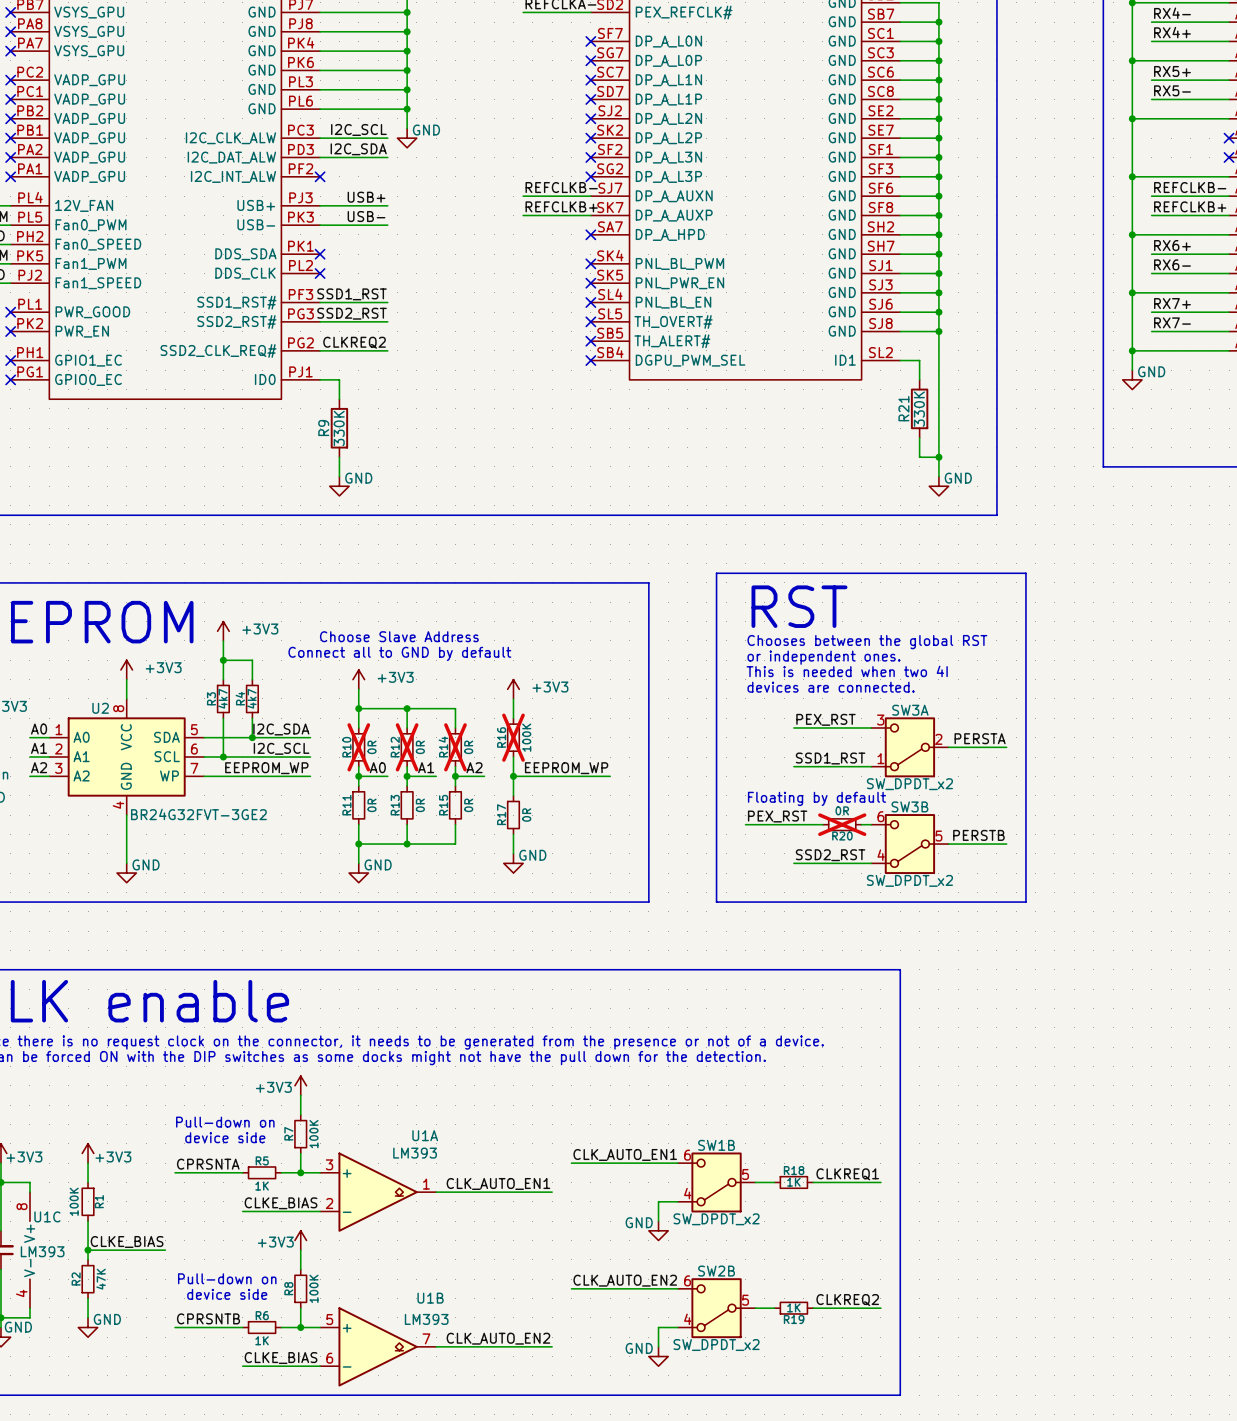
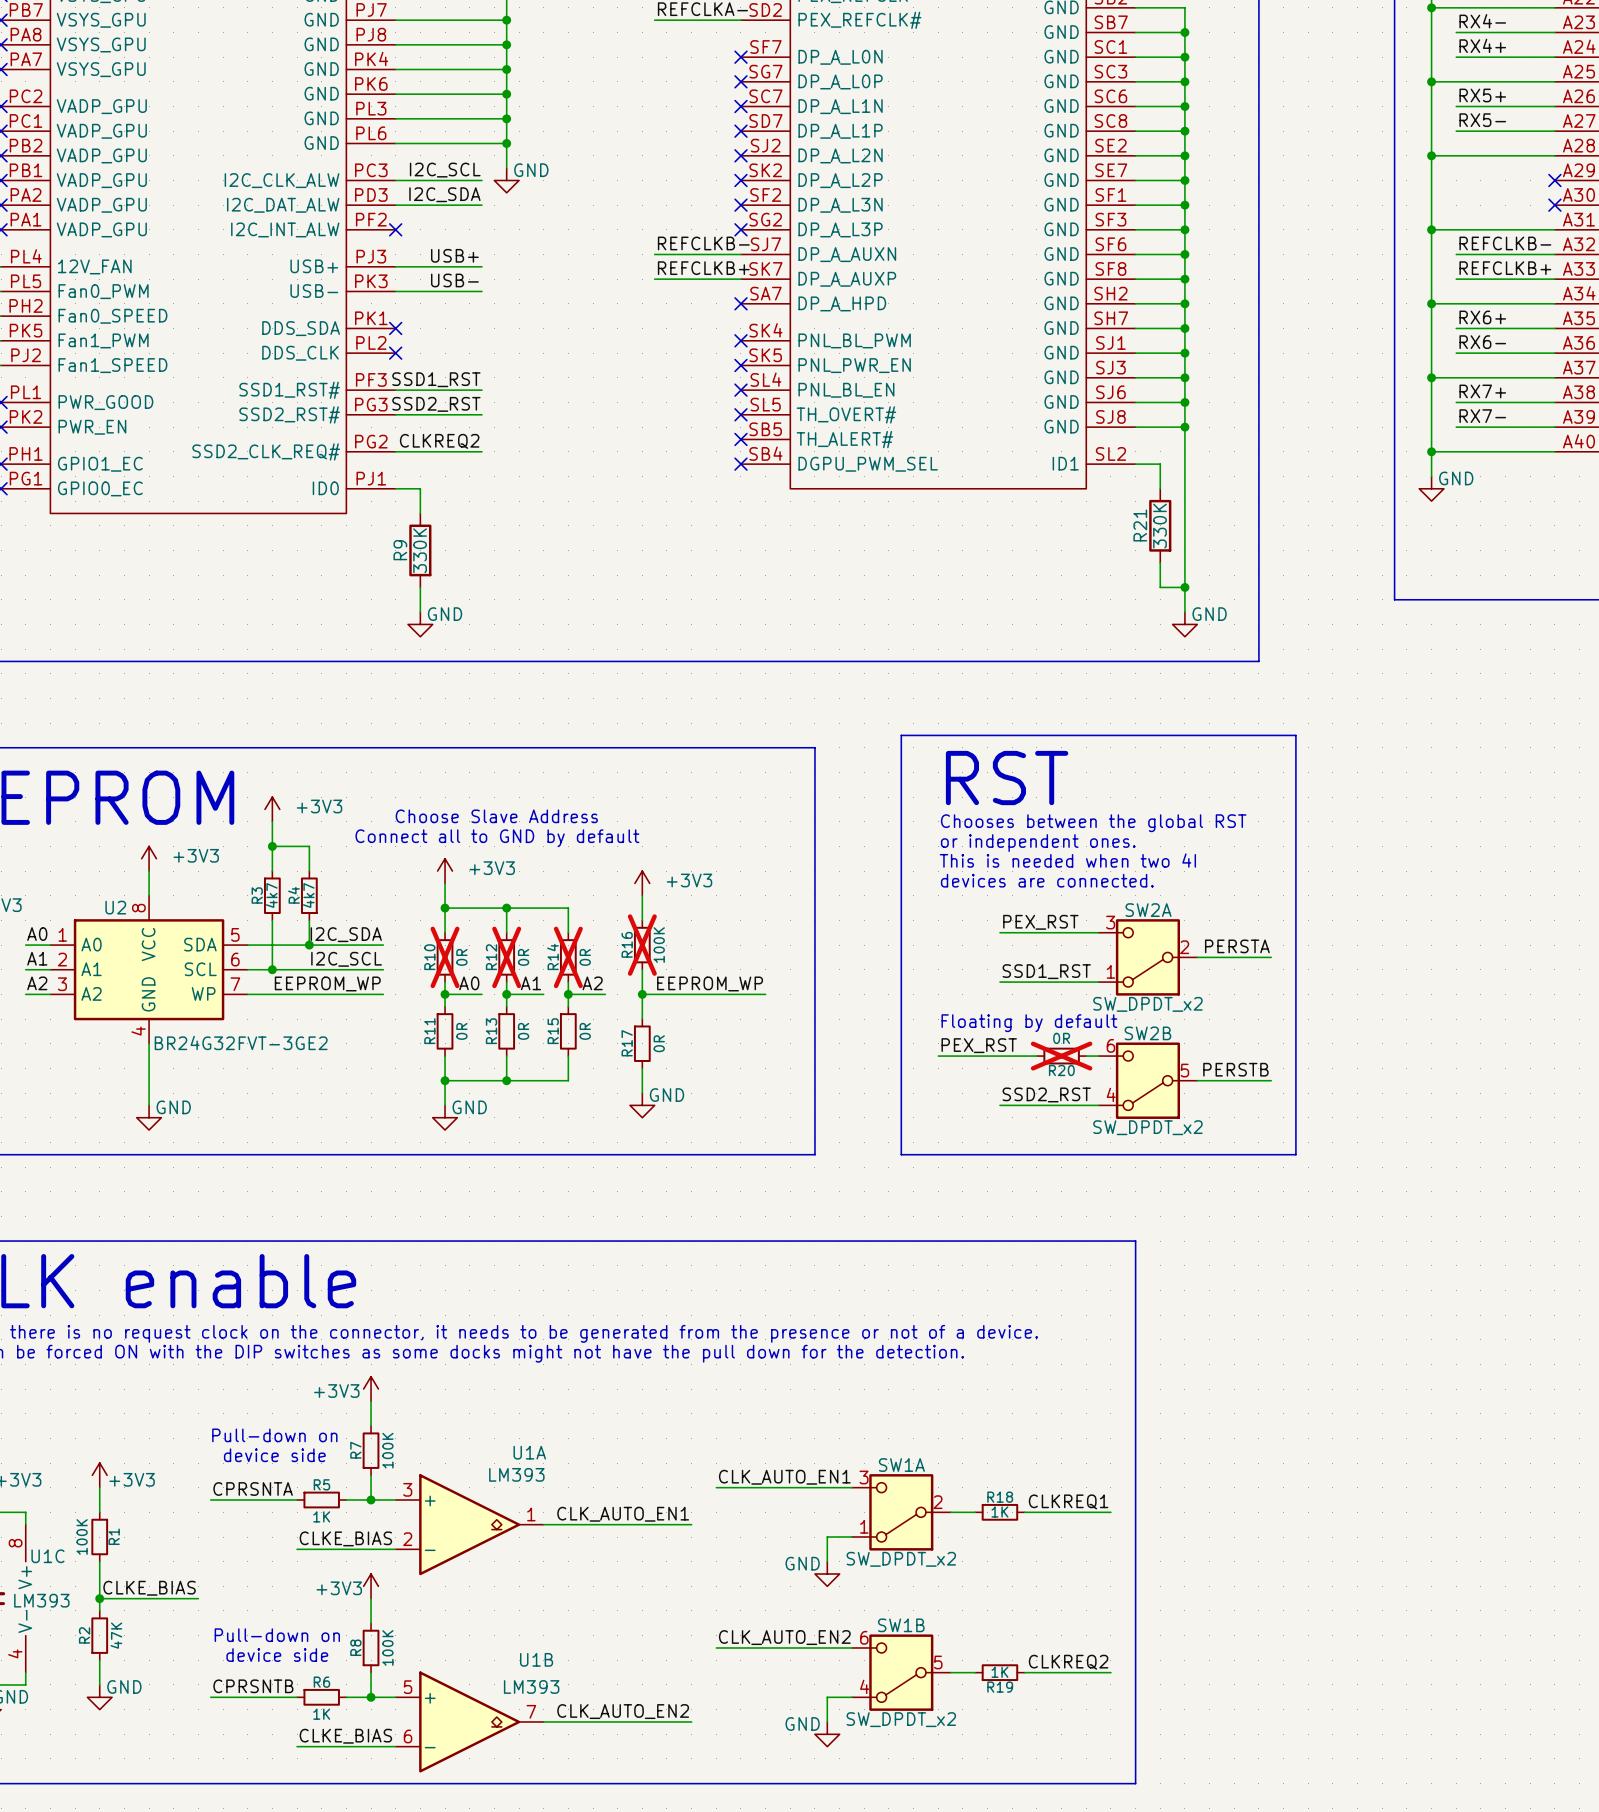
SW3A name: SW3A (910, 710) -> SW2A (1148, 910)
SW3B name: SW3B (909, 806) -> SW2B (1147, 1033)
SW1B name: SW1B (716, 1145) -> SW1A (901, 1465)
SW1B pin number: 6 (687, 1155) -> 3 (864, 1477)
SW1B pin number: 5 (745, 1174) -> 2 (938, 1502)
SW1B pin number: 4 (687, 1193) -> 1 (864, 1526)
SW2B name: SW2B (716, 1271) -> SW1B (901, 1625)

